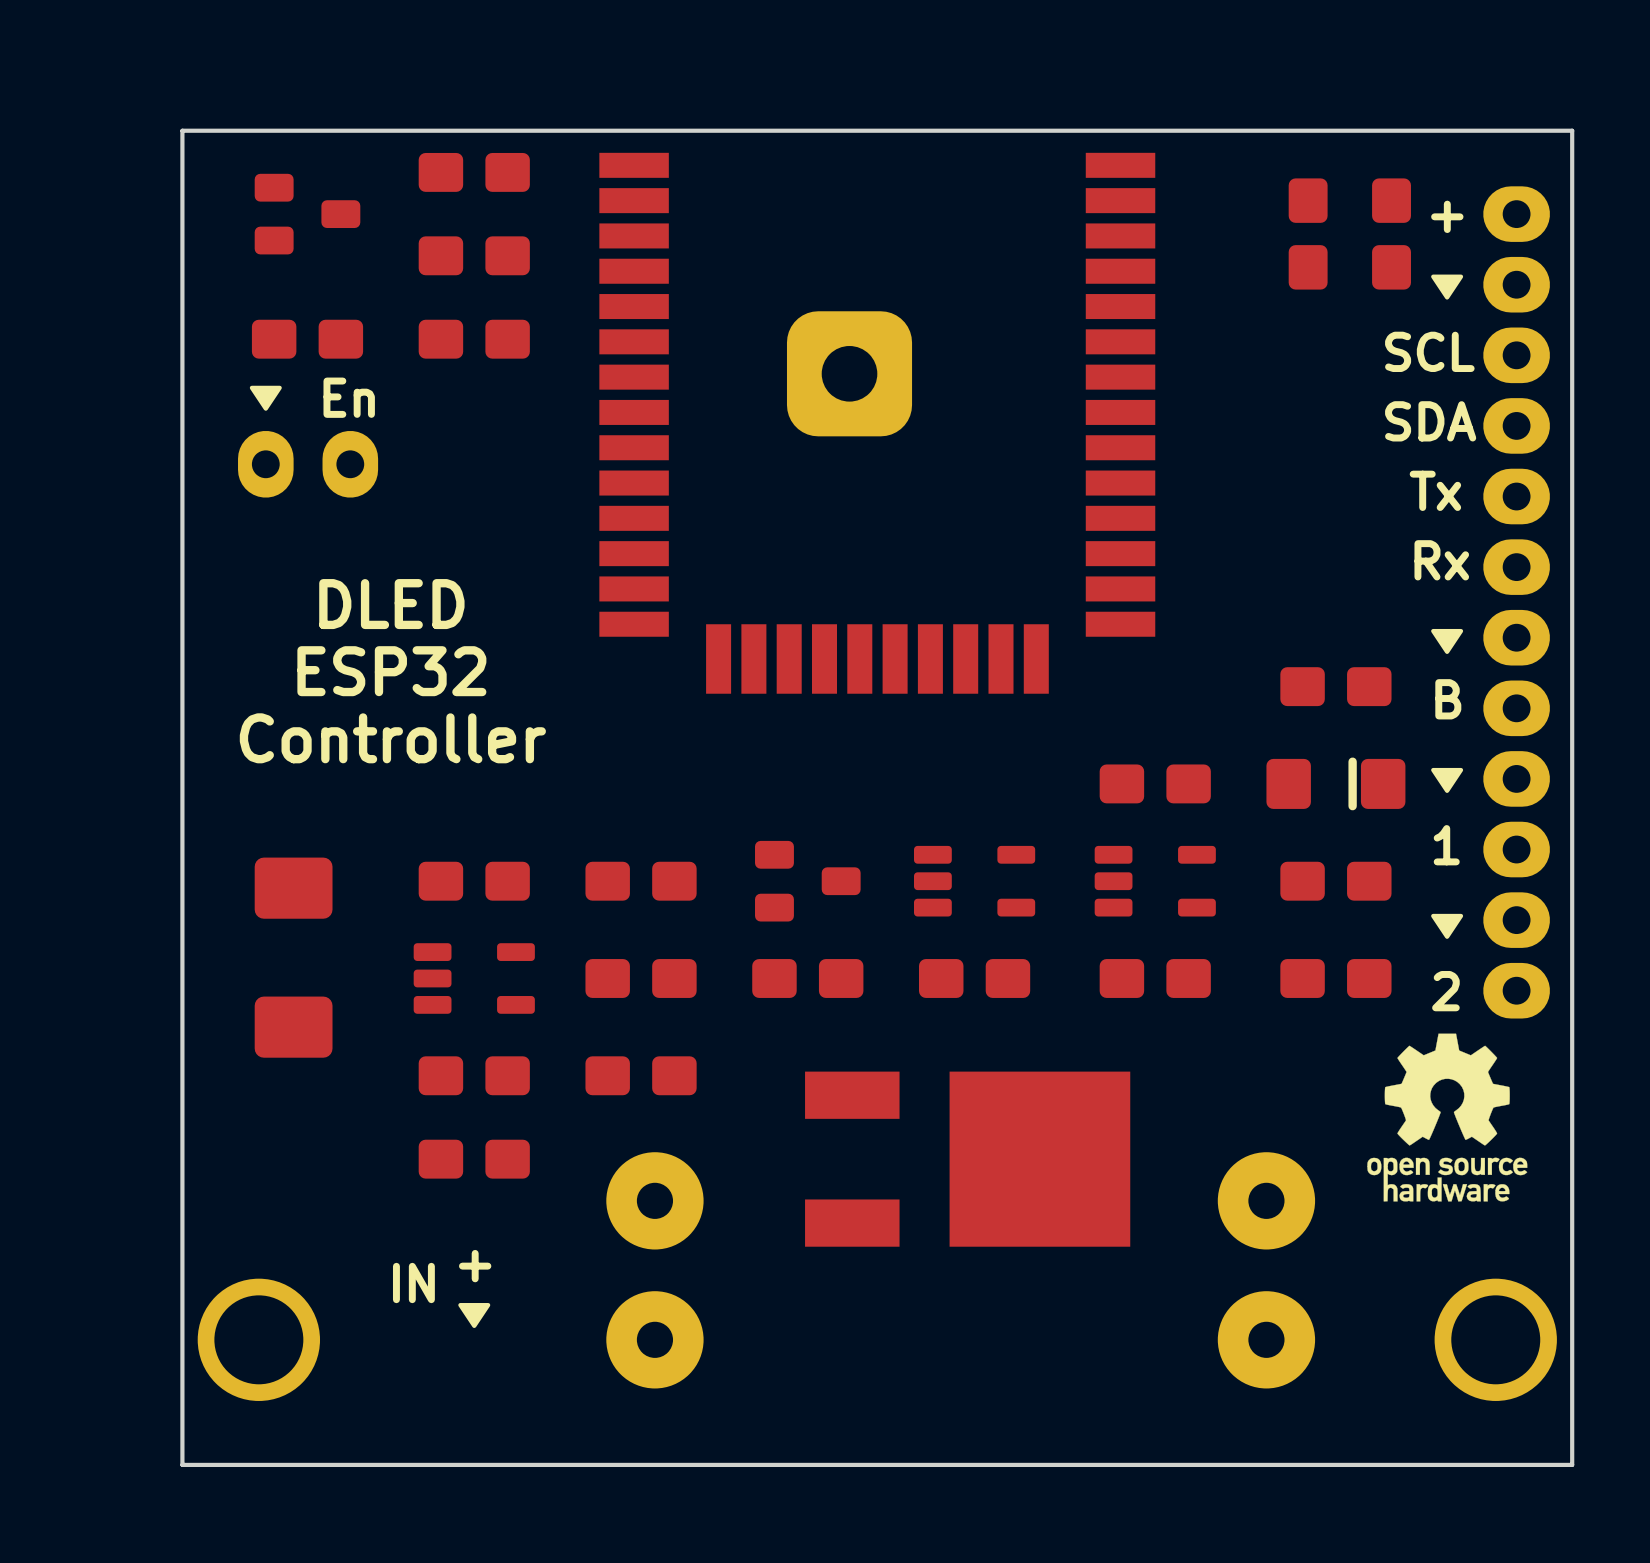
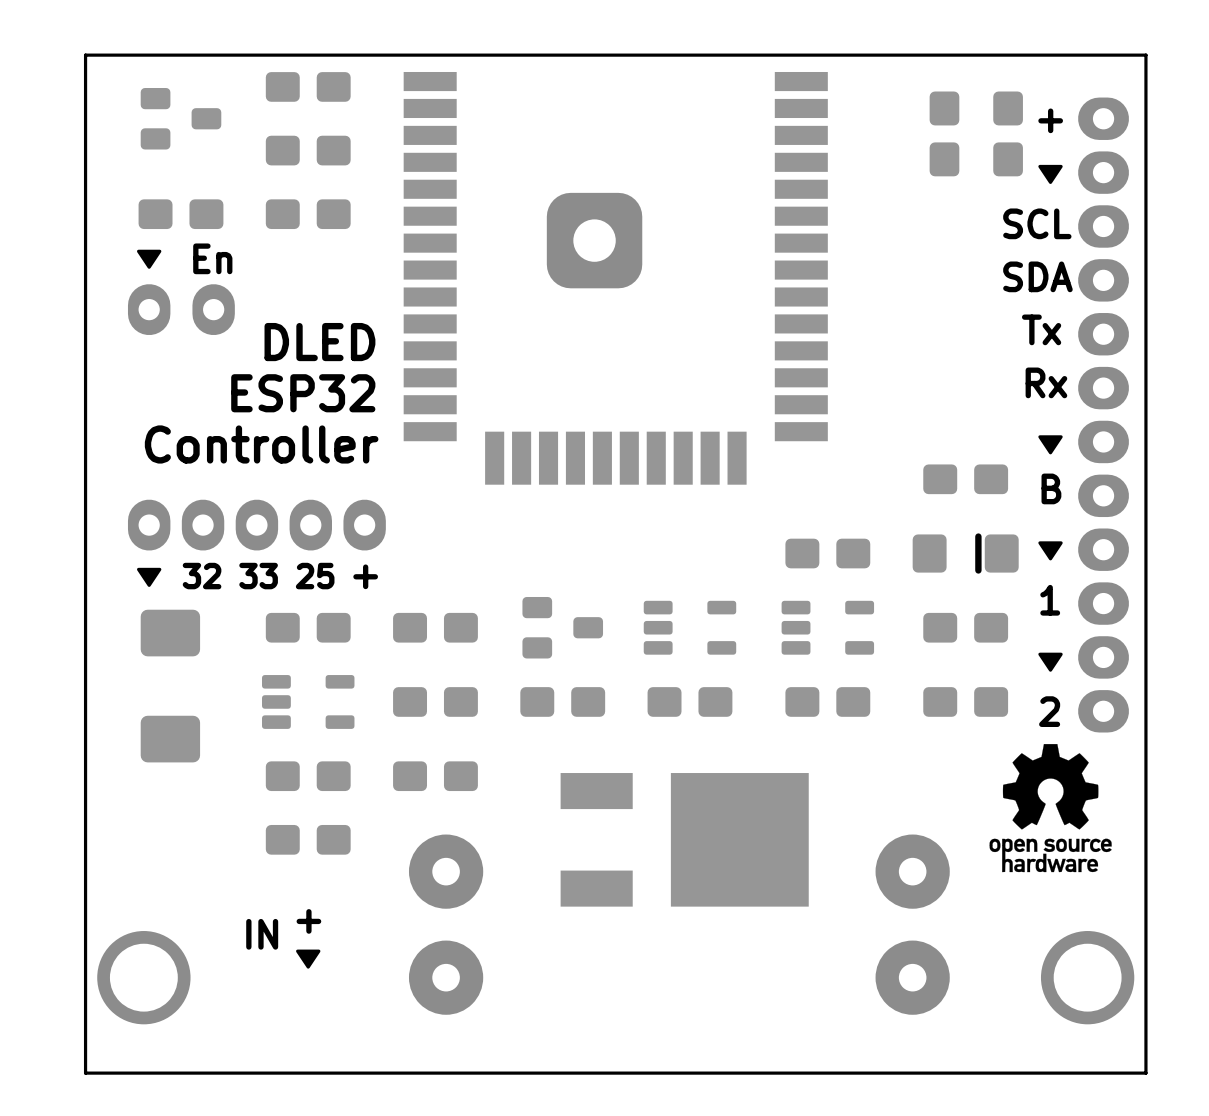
text position: DLED (391, 604) -> DLED (319, 342)
text position: ESP32 (391, 671) -> ESP32 (303, 393)
text position: Controller (392, 738) -> Controller (261, 444)
part: none -> (256, 525)
drawing: none -> [136, 567, 162, 587]
text: none -> 32 33 25 (258, 576)
text: none -> + (365, 576)

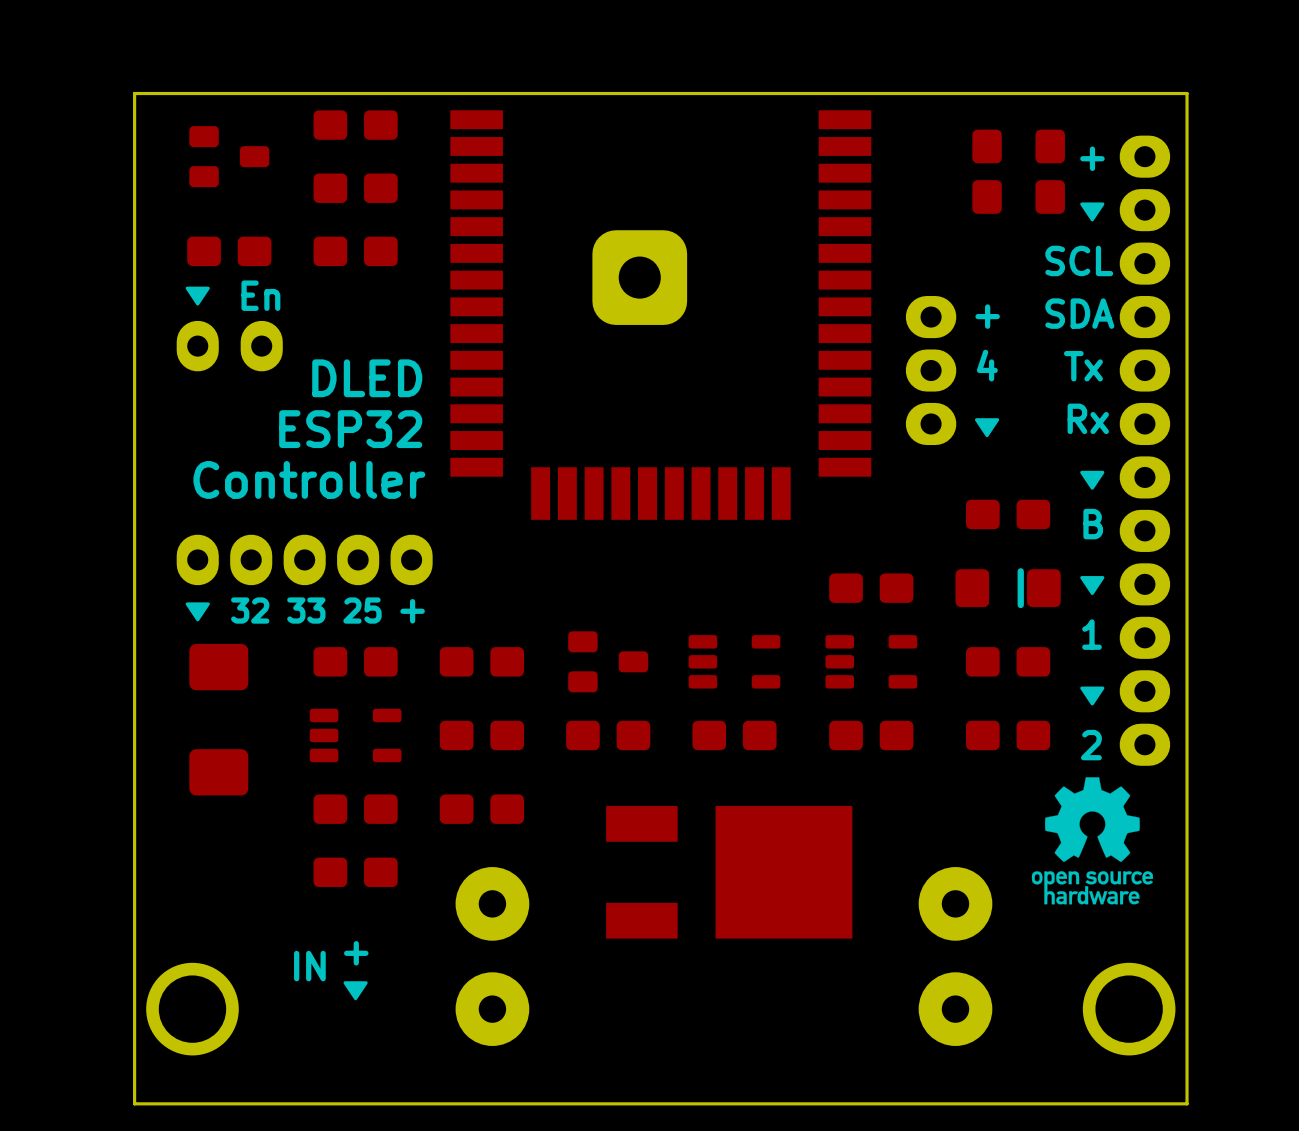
text: none -> + (987, 316)
text: none -> 4 (987, 365)
part: none -> (931, 370)
drawing: none -> [974, 418, 1000, 438]

